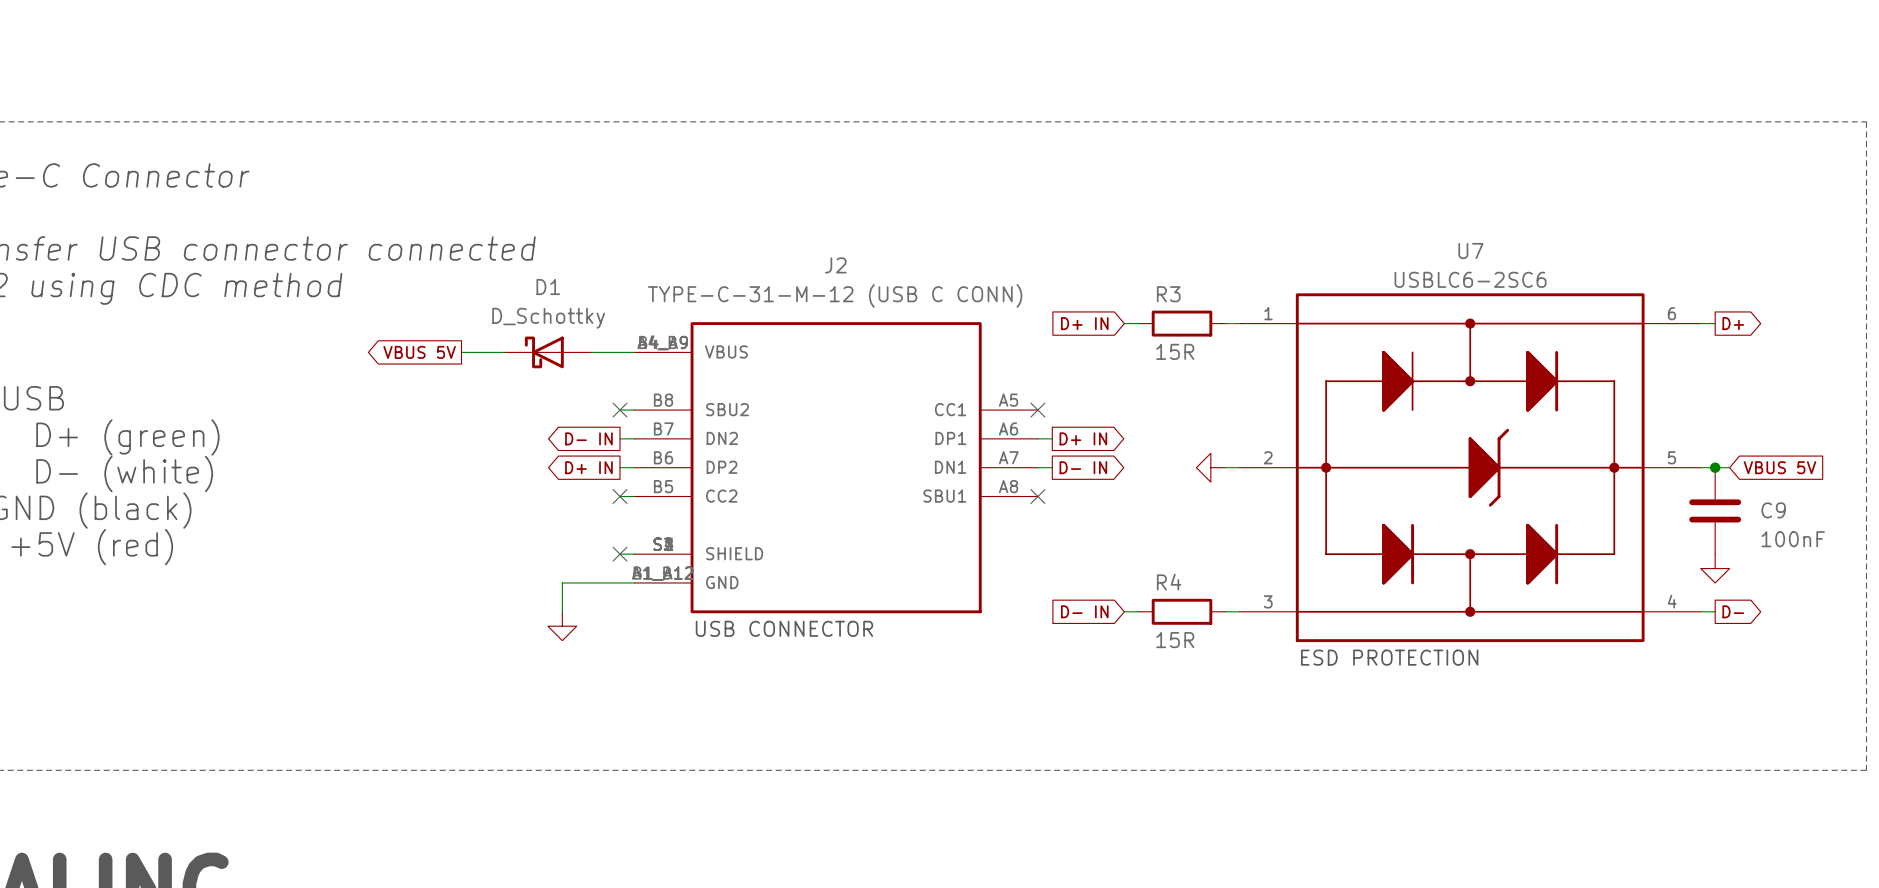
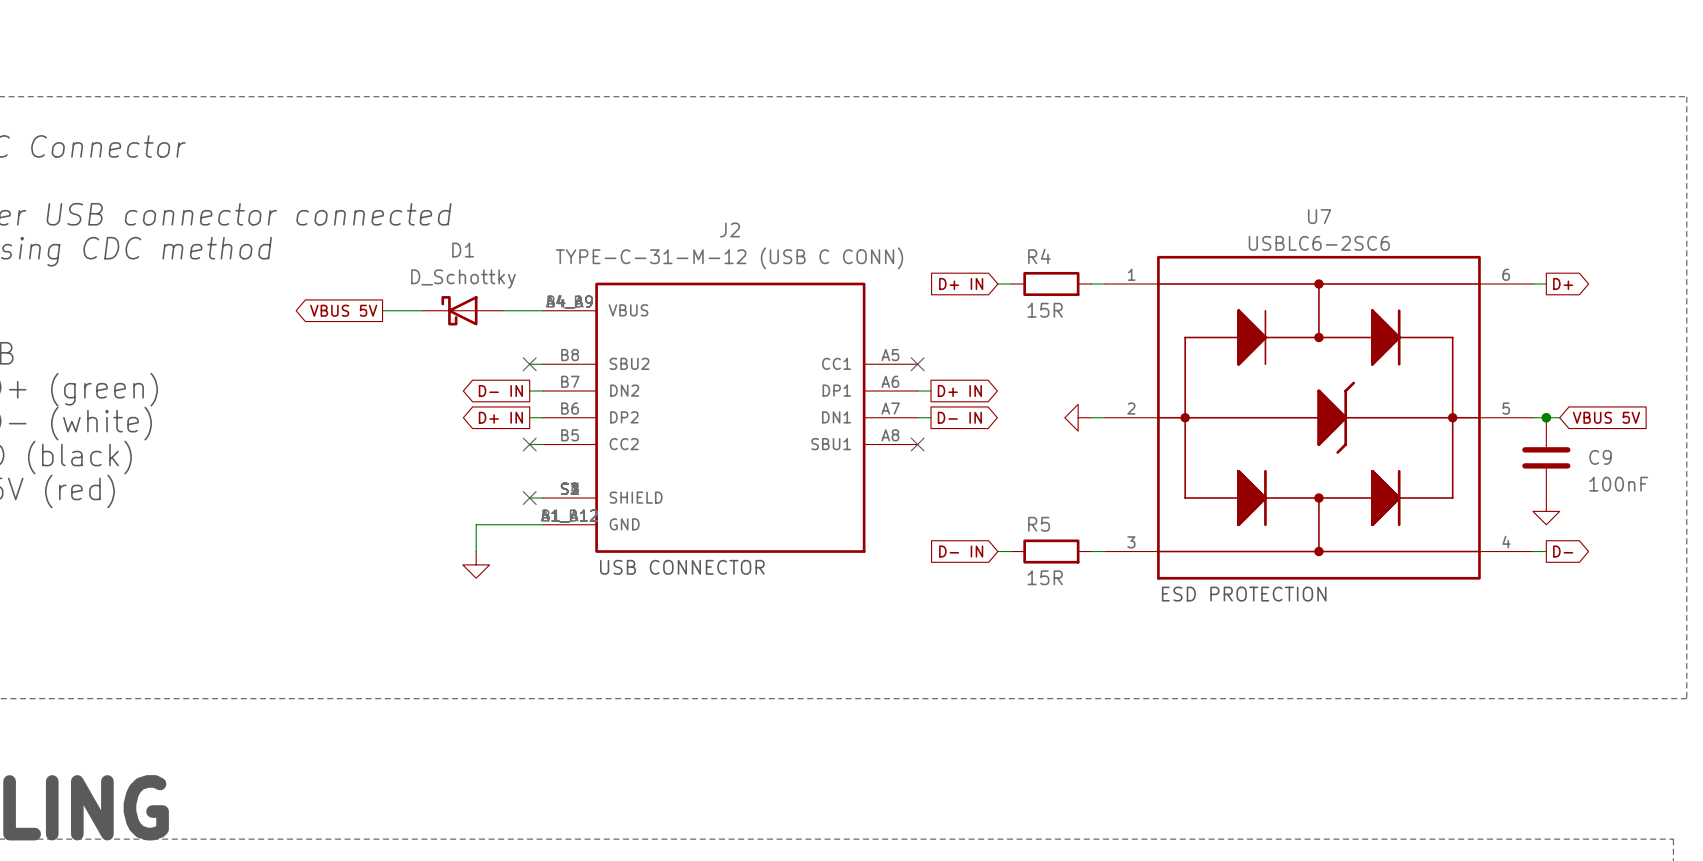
R3 name: R3 (1168, 294) -> R4 (1039, 256)
R4 name: R4 (1169, 582) -> R5 (1039, 524)

